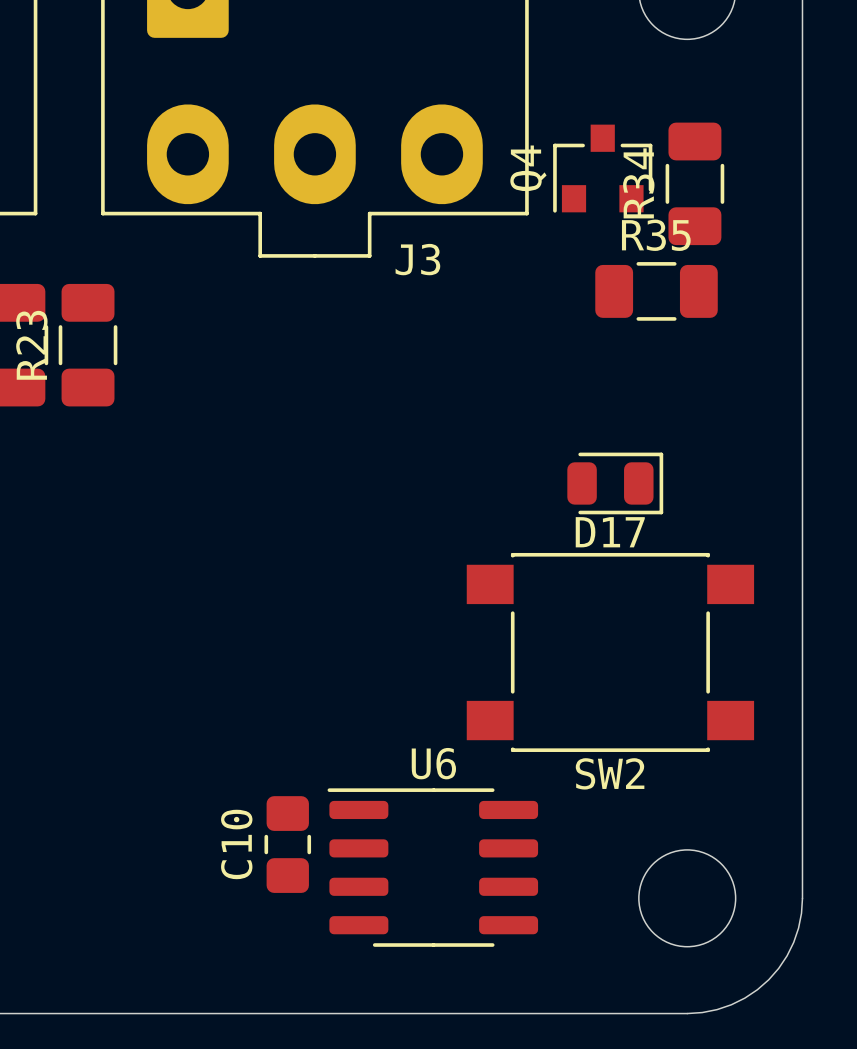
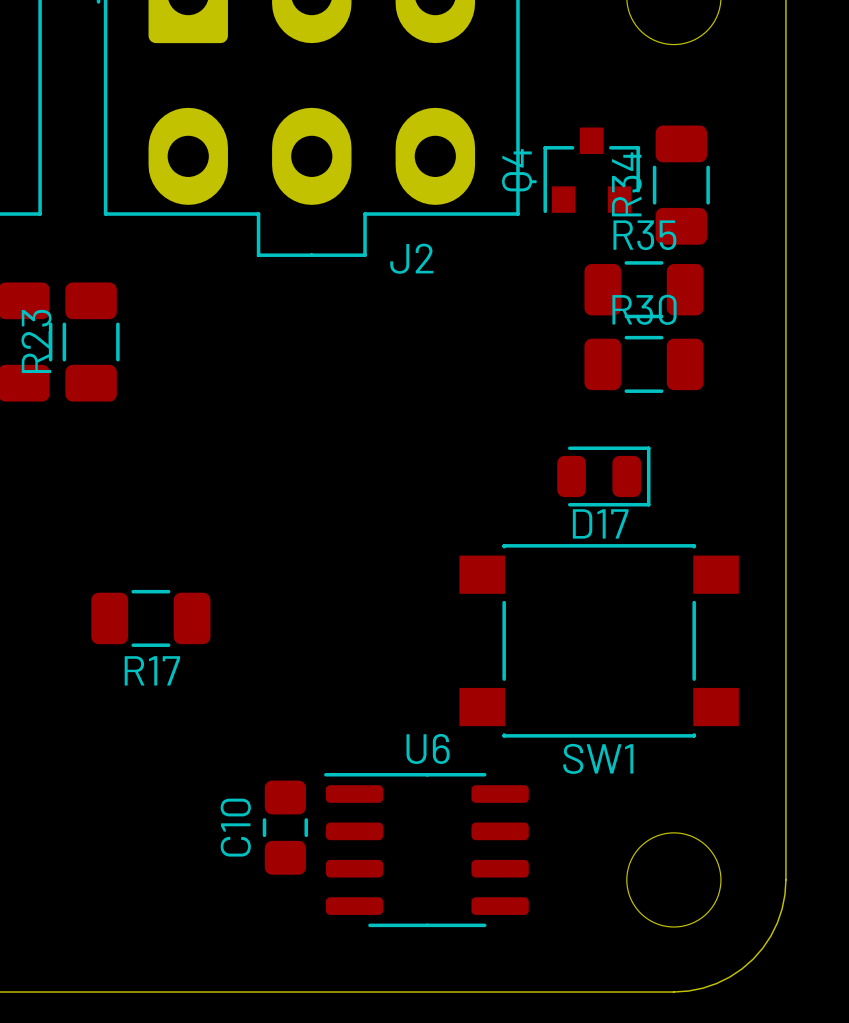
J3 name: J3 (417, 259) -> J2 (411, 258)
R30: none -> (643, 364)
R17: none -> (150, 618)
SW2 name: SW2 (610, 773) -> SW1 (598, 758)

